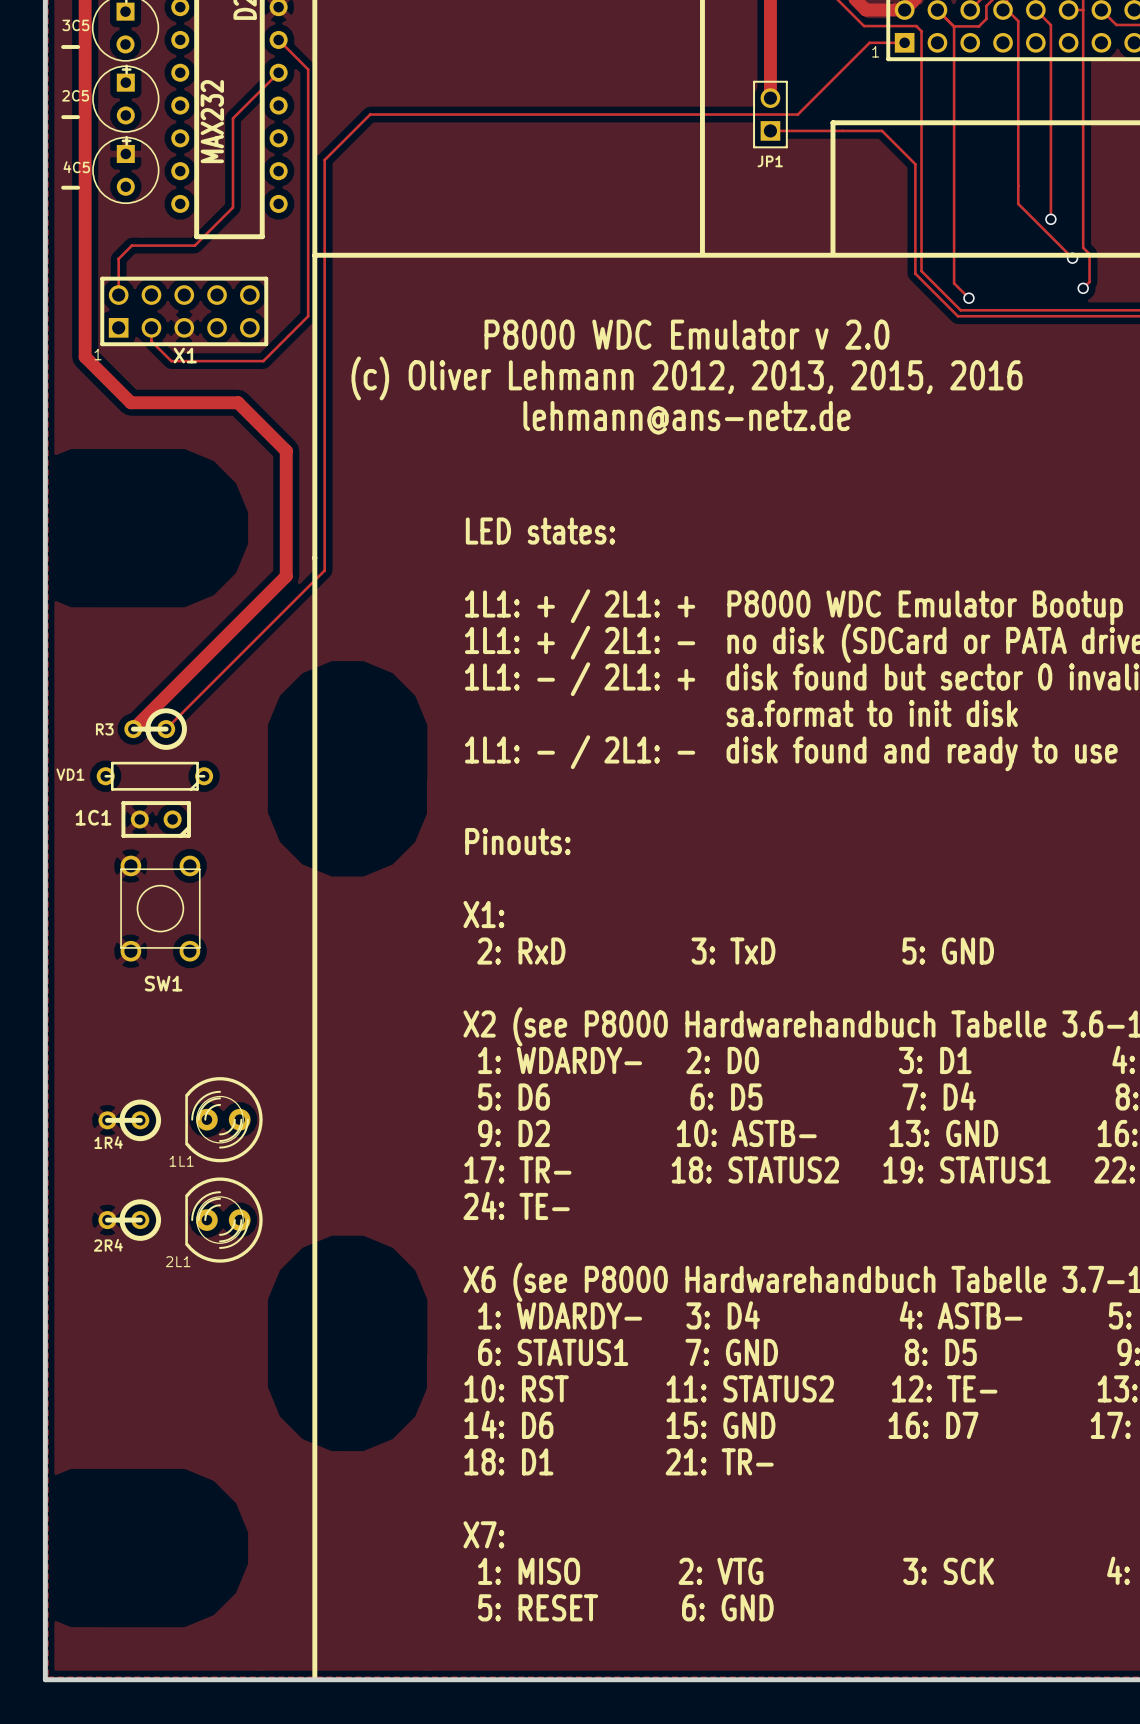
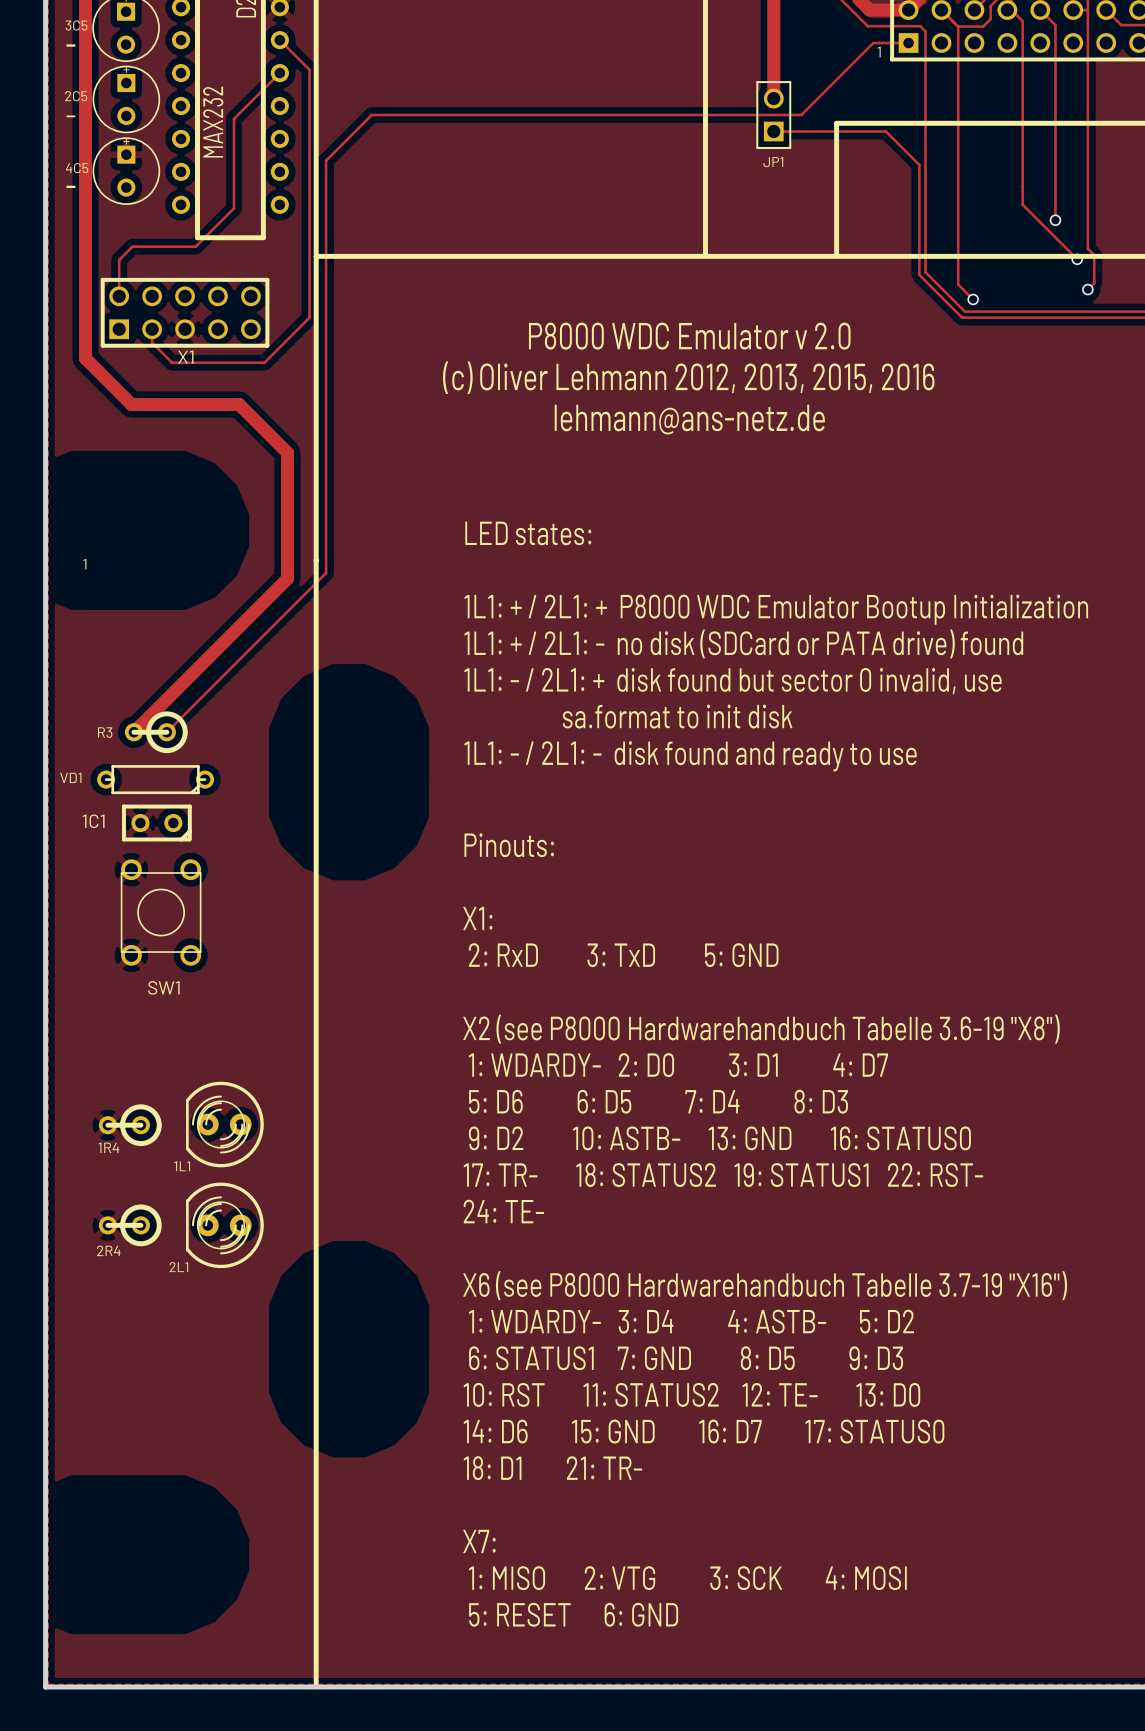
text position: 1 (98, 354) -> 1 (84, 564)

